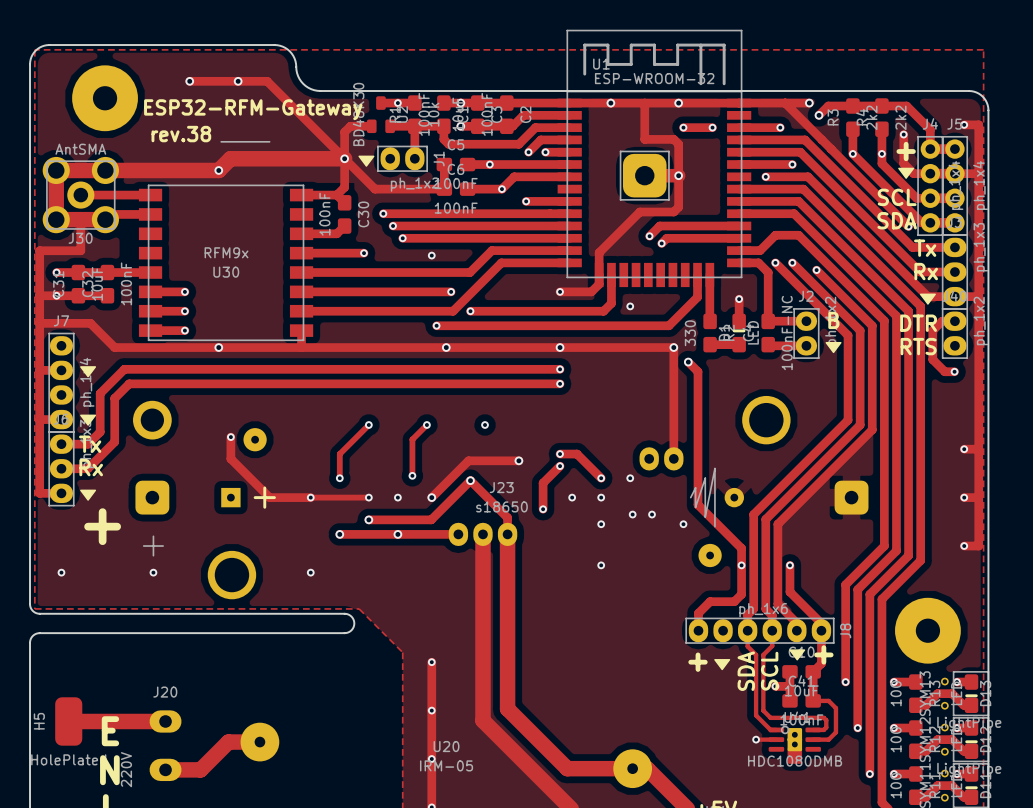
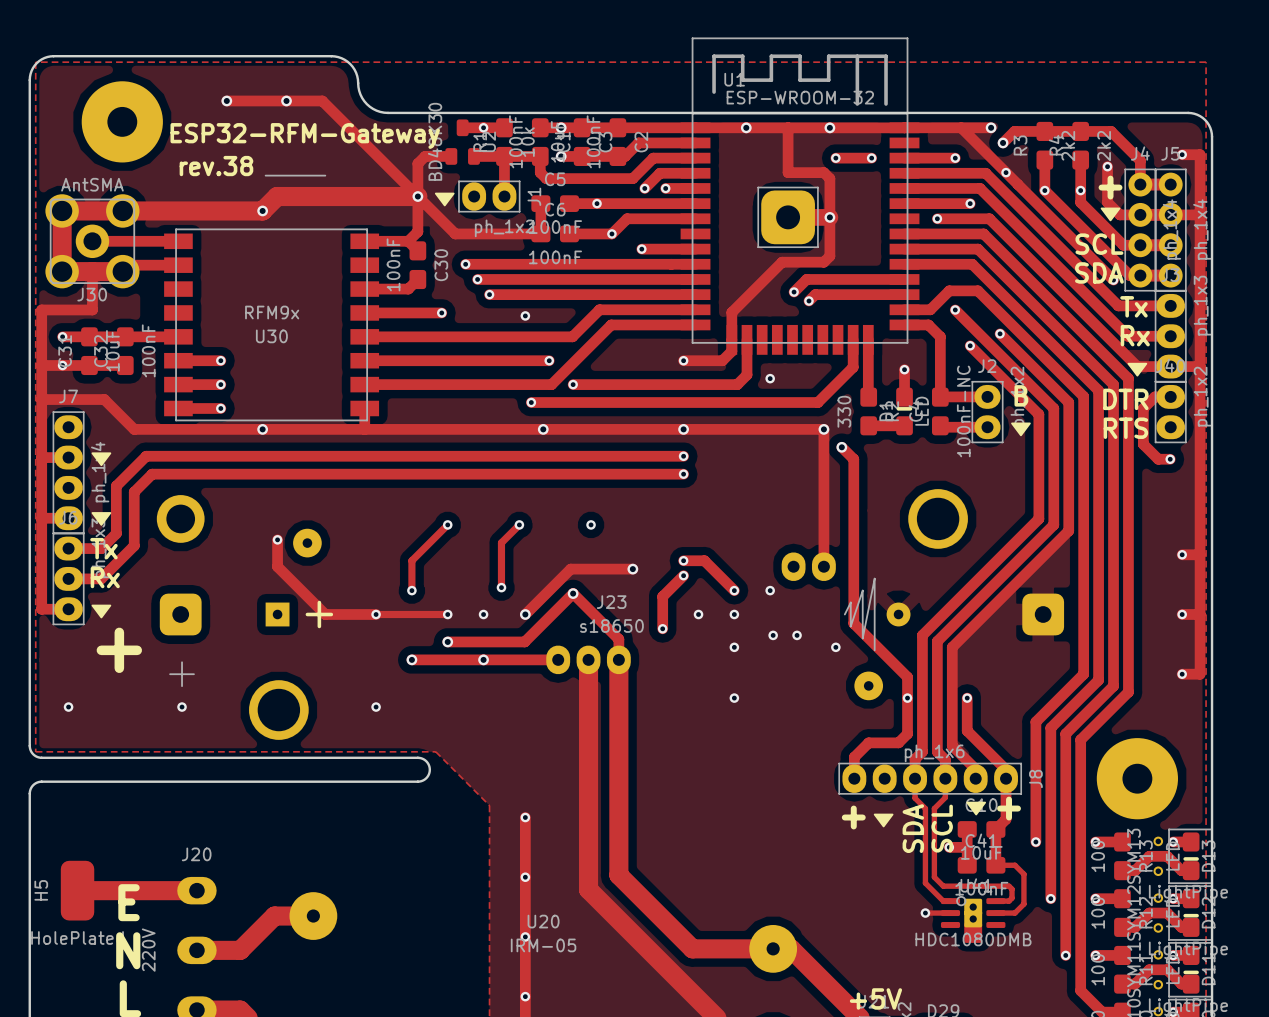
via: none -> (1006, 172)
track: none -> (955, 309) (970, 324)
via: none -> (955, 309)
track: (775, 262) (792, 279) -> none
via: (775, 262) -> none
via: (792, 262) -> none
via: none -> (970, 345)

